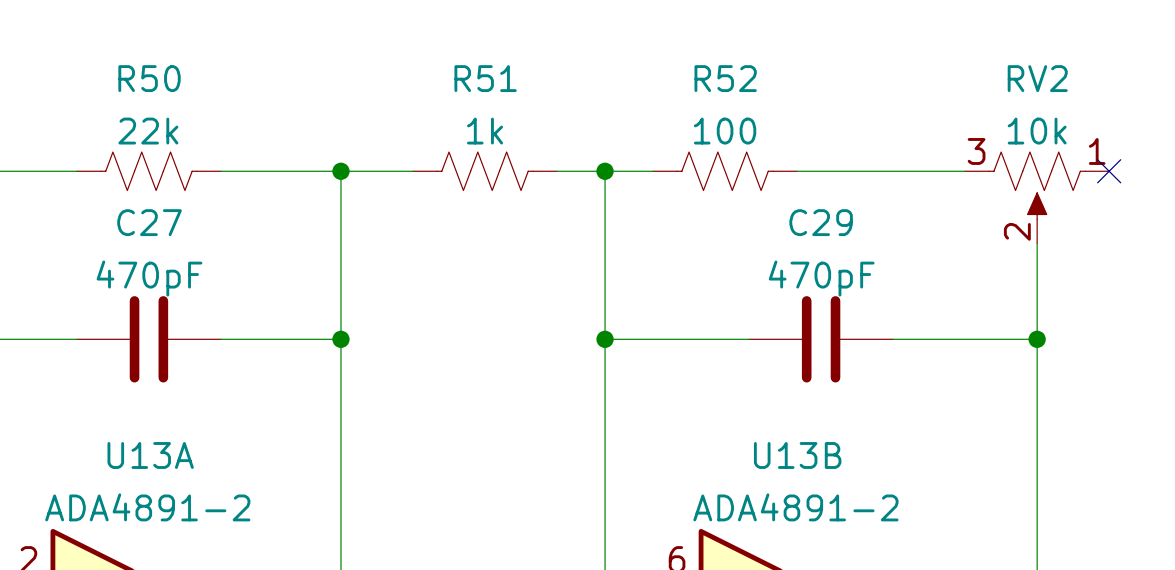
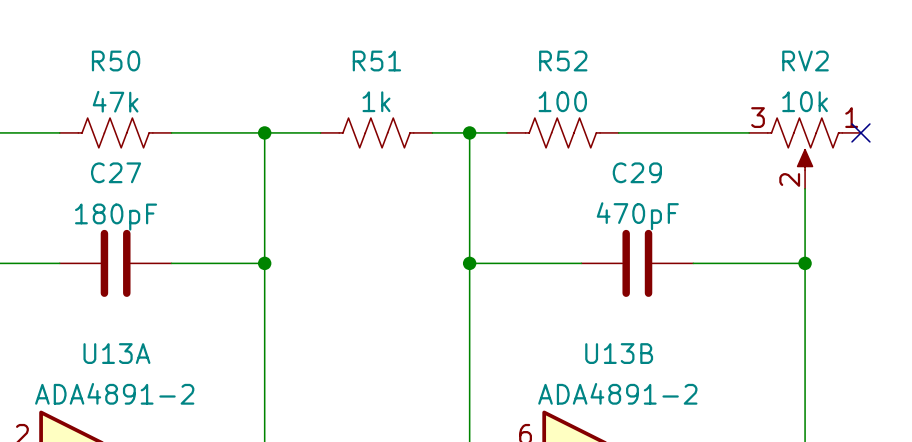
R50 value: 22k (148, 131) -> 47k (115, 101)
C27 value: 470pF (149, 278) -> 180pF (116, 217)

